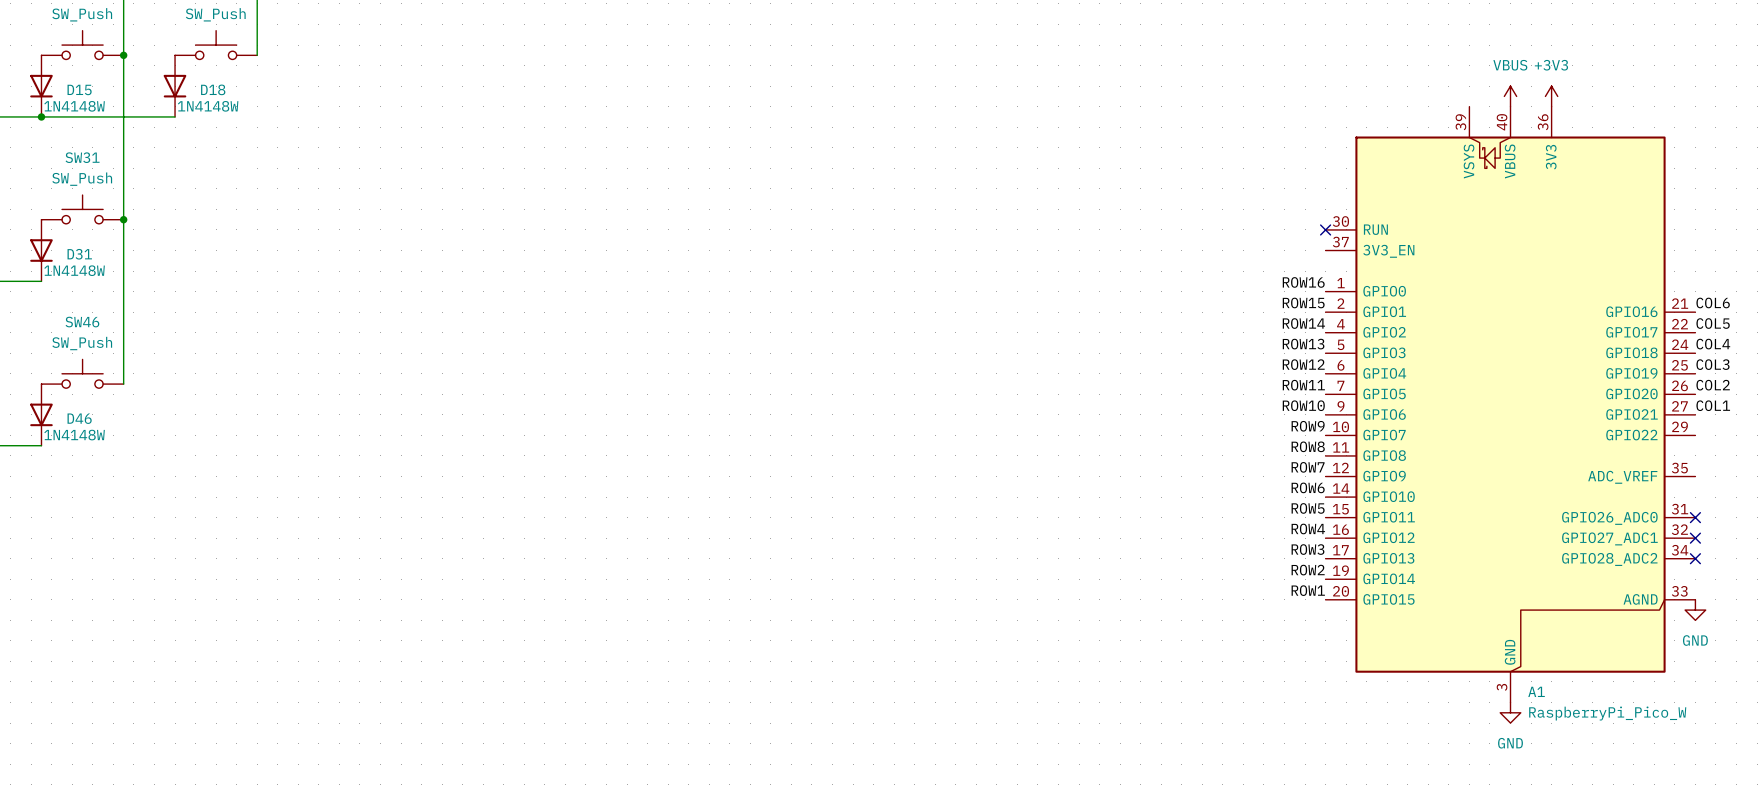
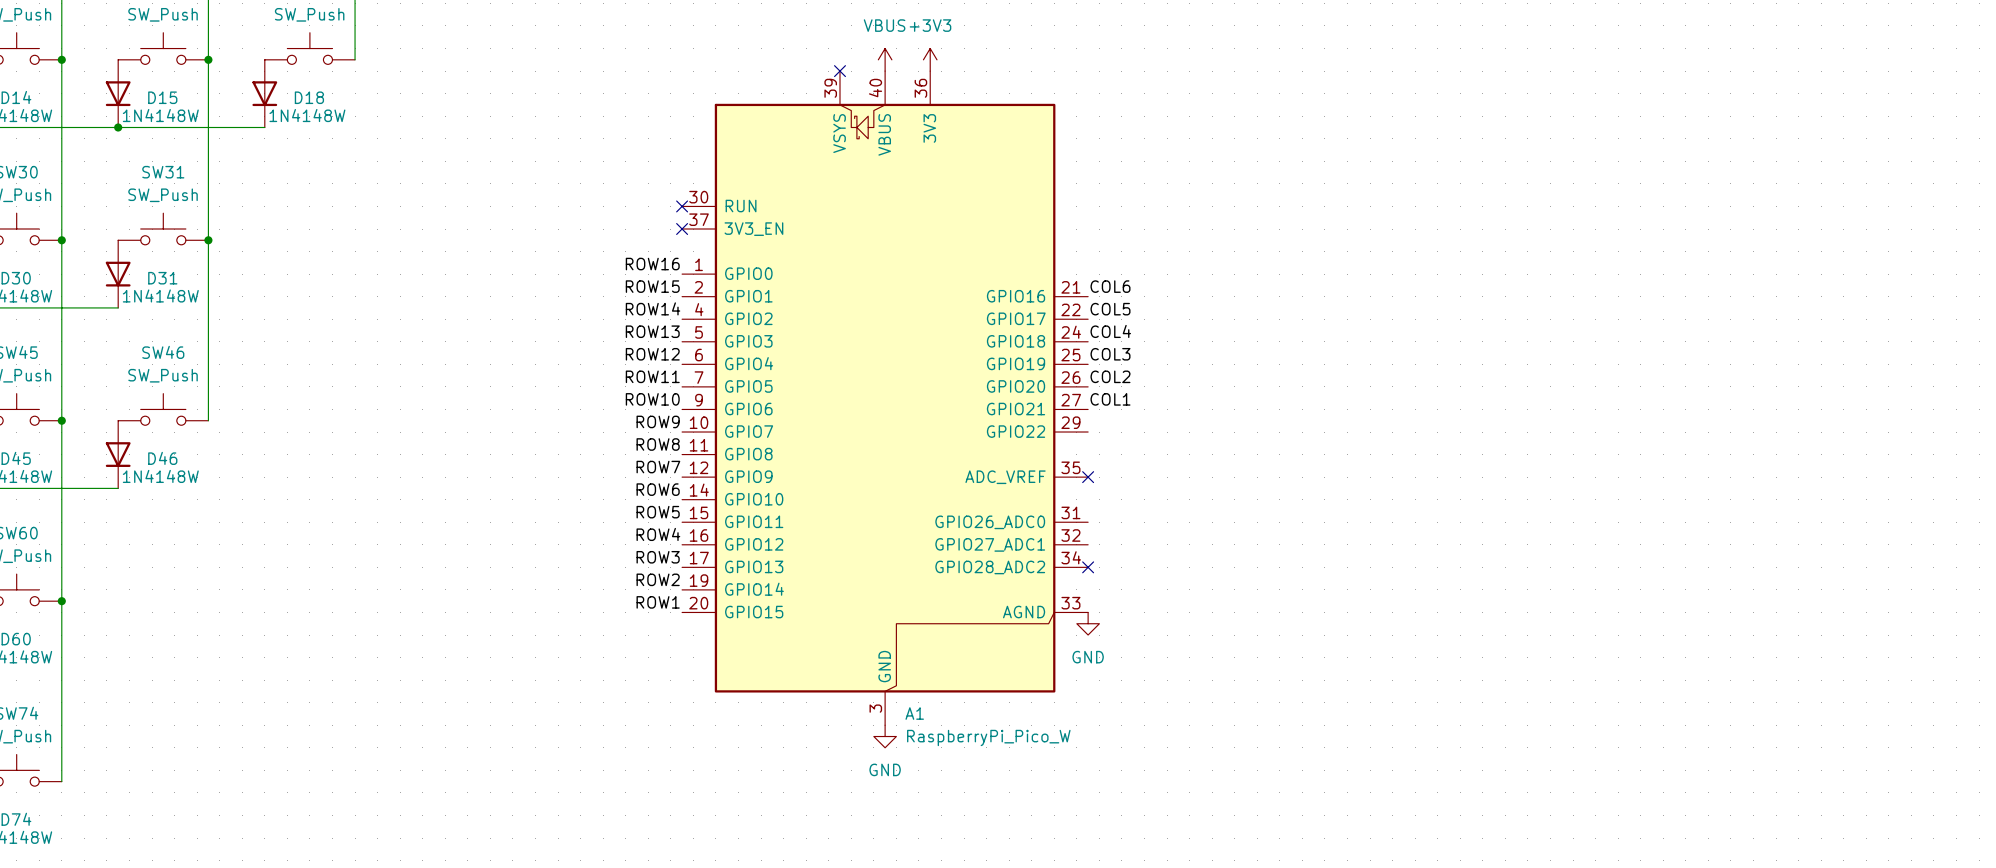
power symbol: none -> VBUS (885, 59)
power symbol: none -> +3V3 (930, 59)
no-connect mark: none -> (839, 71)
power symbol: VBUS (1510, 96) -> none
power symbol: +3V3 (1551, 96) -> none
no-connect mark: none -> (682, 206)
no-connect mark: none -> (682, 229)
no-connect mark: (1325, 229) -> none
label: none -> ROW16 (652, 264)
label: none -> ROW15 (652, 286)
label: none -> COL6 (1110, 286)
label: none -> ROW14 (653, 308)
label: none -> COL5 (1110, 309)
label: ROW16 (1303, 282) -> none
label: none -> ROW13 (652, 331)
label: none -> COL4 (1110, 331)
label: ROW15 (1303, 302) -> none
label: COL6 (1713, 302) -> none
label: none -> ROW12 (652, 354)
label: none -> COL3 (1110, 354)
label: ROW14 (1303, 323) -> none
label: COL5 (1713, 323) -> none
label: none -> ROW11 (652, 376)
label: none -> COL2 (1110, 376)
label: ROW13 (1303, 344) -> none
label: COL4 (1713, 344) -> none
label: none -> ROW10 (652, 399)
label: none -> COL1 (1110, 399)
label: ROW12 (1303, 364) -> none
label: COL3 (1712, 364) -> none
label: none -> ROW9 (658, 421)
label: ROW11 (1303, 385) -> none
label: COL2 (1713, 385) -> none
A1 position: (1510, 404) -> (885, 398)
label: none -> ROW8 (658, 444)
label: ROW10 (1303, 405) -> none
label: COL1 (1713, 405) -> none
label: none -> ROW7 (658, 467)
label: ROW9 (1308, 426) -> none
no-connect mark: none -> (1088, 477)
label: none -> ROW6 (658, 489)
label: ROW8 (1308, 446) -> none
label: none -> ROW5 (658, 512)
label: ROW7 (1308, 467) -> none
label: none -> ROW4 (658, 534)
label: ROW6 (1308, 487) -> none
label: none -> ROW3 (658, 557)
label: ROW5 (1308, 508) -> none
no-connect mark: none -> (1088, 567)
no-connect mark: (1695, 517) -> none
label: none -> ROW2 (658, 579)
label: ROW4 (1308, 528) -> none
no-connect mark: (1695, 538) -> none
label: none -> ROW1 (658, 602)
label: ROW3 (1307, 549) -> none
no-connect mark: (1695, 558) -> none
power symbol: none -> GND (1088, 623)
label: ROW2 (1308, 570) -> none
label: ROW1 (1308, 590) -> none
power symbol: GND (1695, 610) -> none
power symbol: none -> GND (885, 736)
power symbol: GND (1510, 712) -> none

